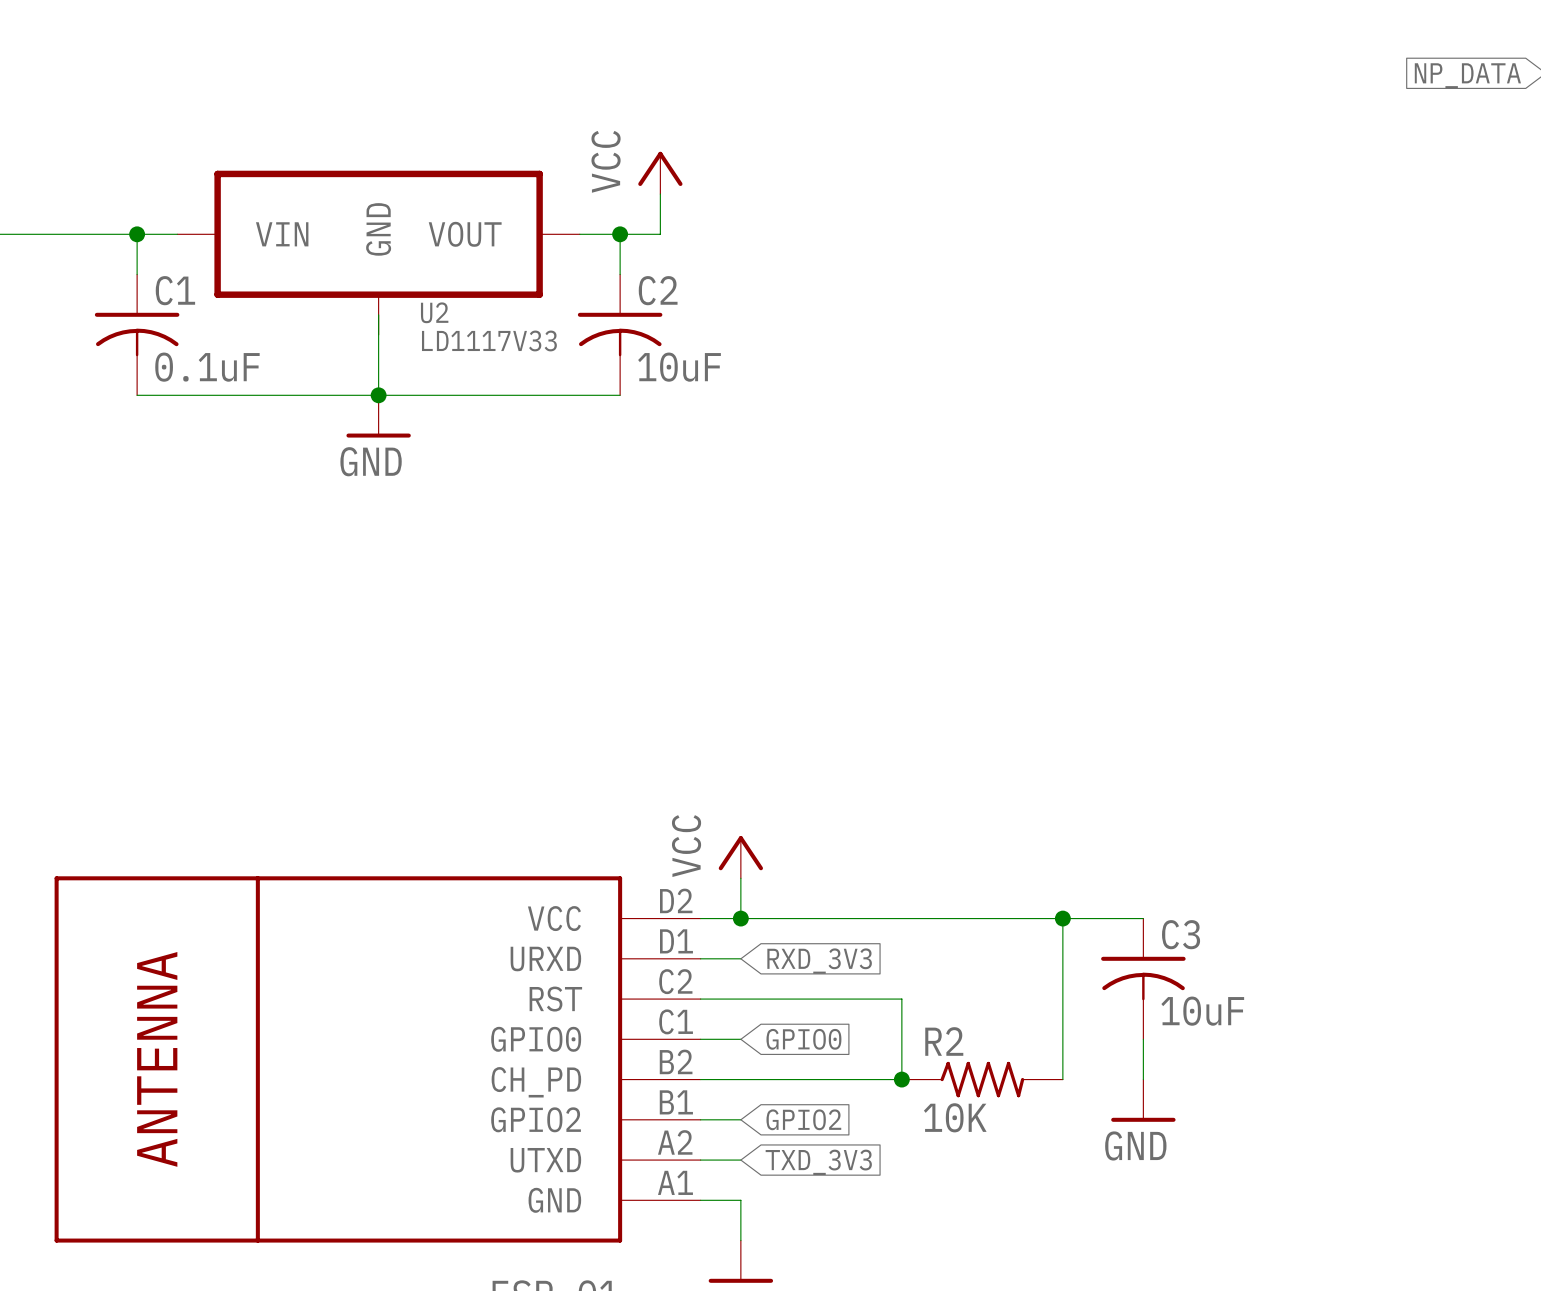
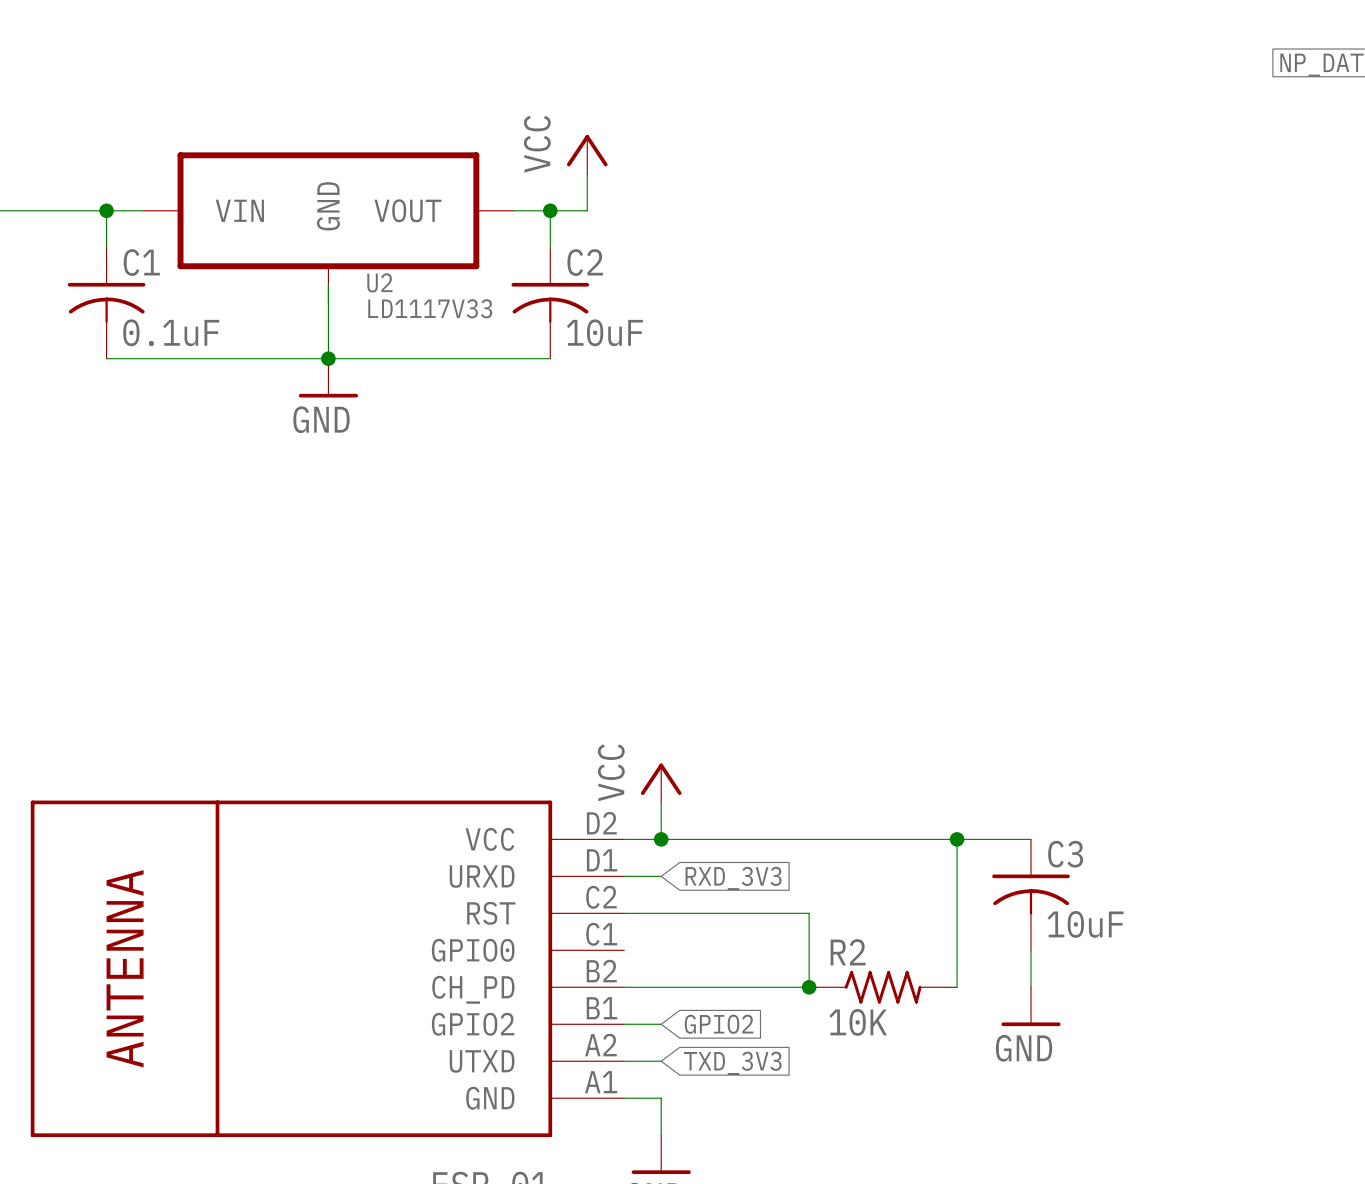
wire: (700, 1039) (740, 1039) -> none
global label: GPIO0 (803, 1039) -> none

